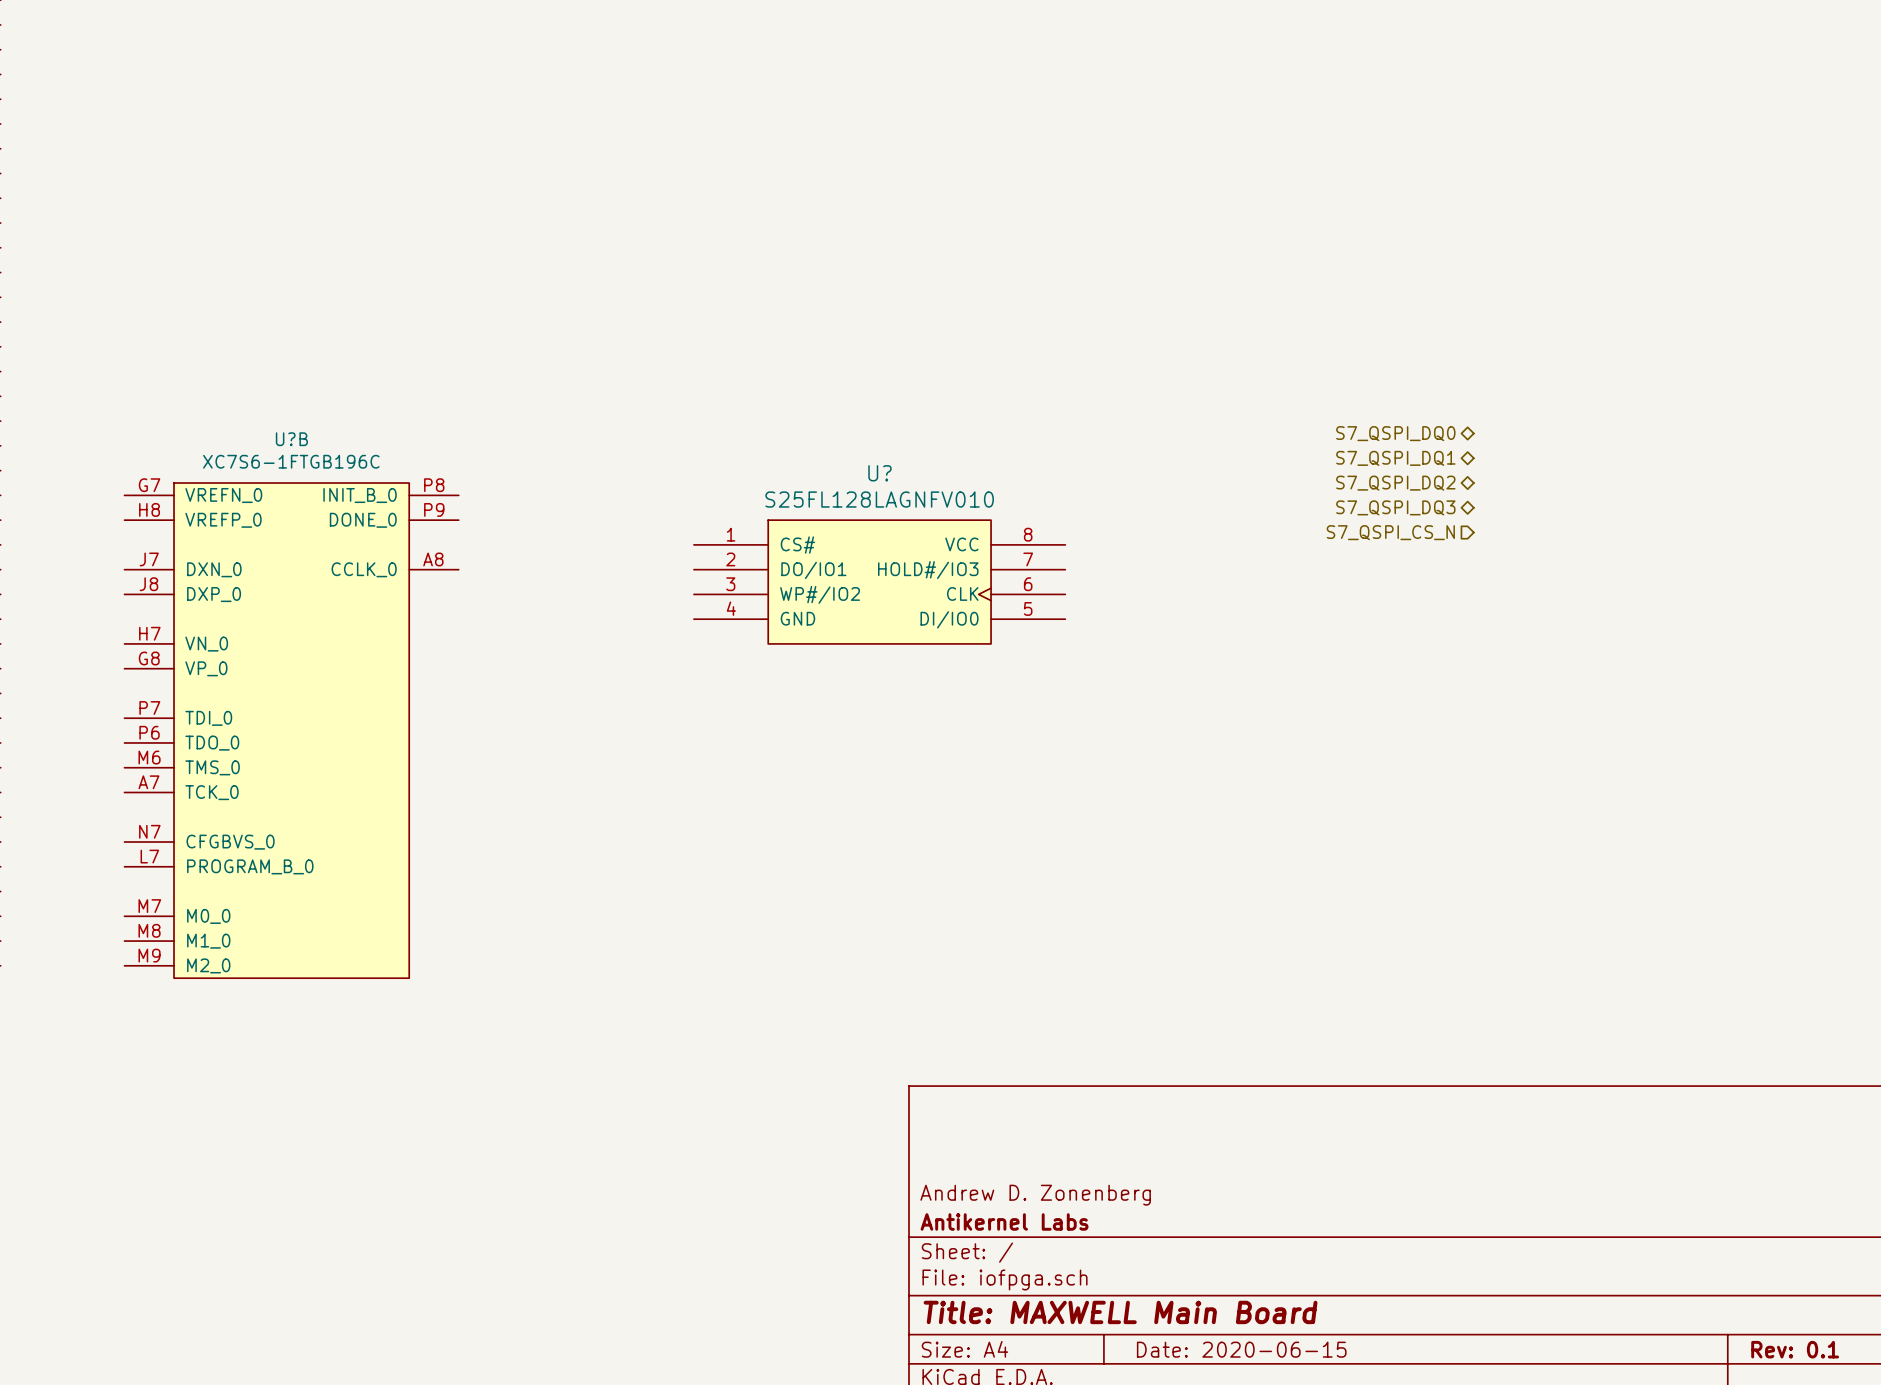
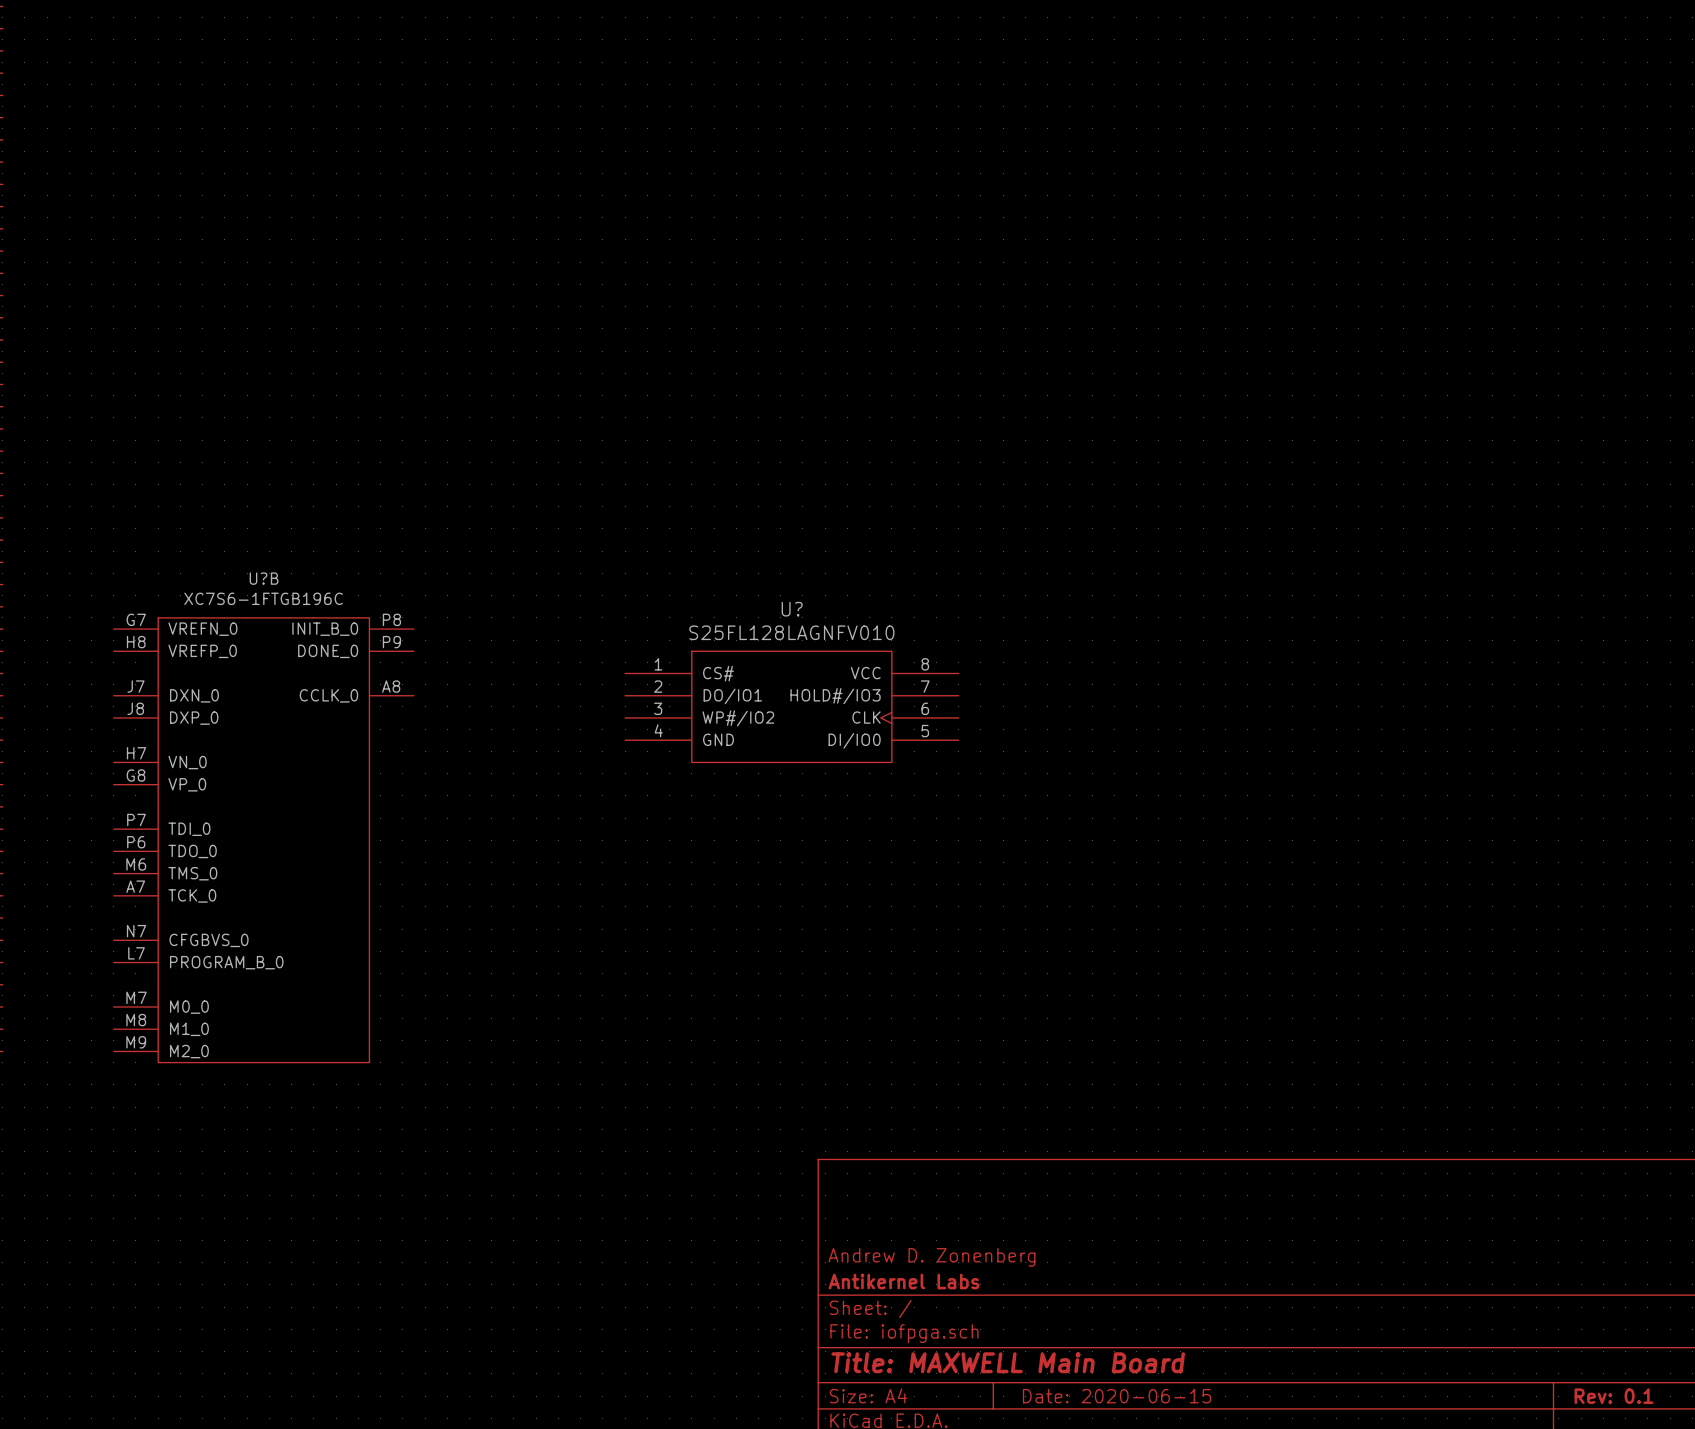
hierarchical label: S7_QSPI_DQ0 (1395, 433) -> none
hierarchical label: S7_QSPI_DQ1 (1395, 458) -> none
hierarchical label: S7_QSPI_DQ2 (1395, 483) -> none
hierarchical label: S7_QSPI_DQ3 (1395, 507) -> none
hierarchical label: S7_QSPI_CS_N (1390, 532) -> none

